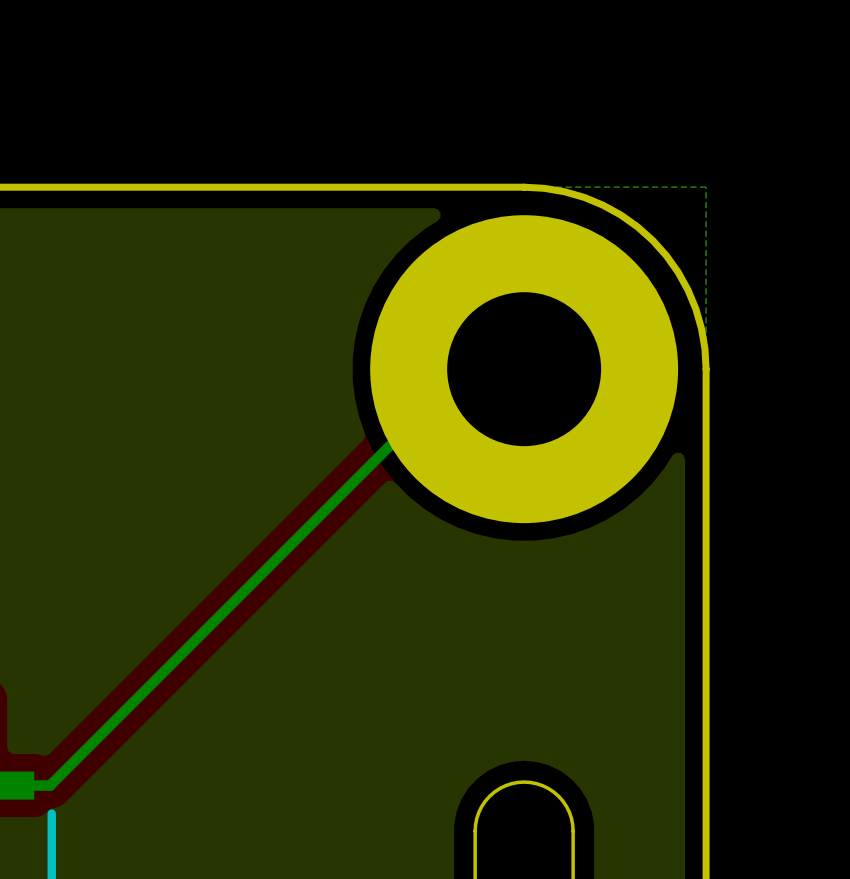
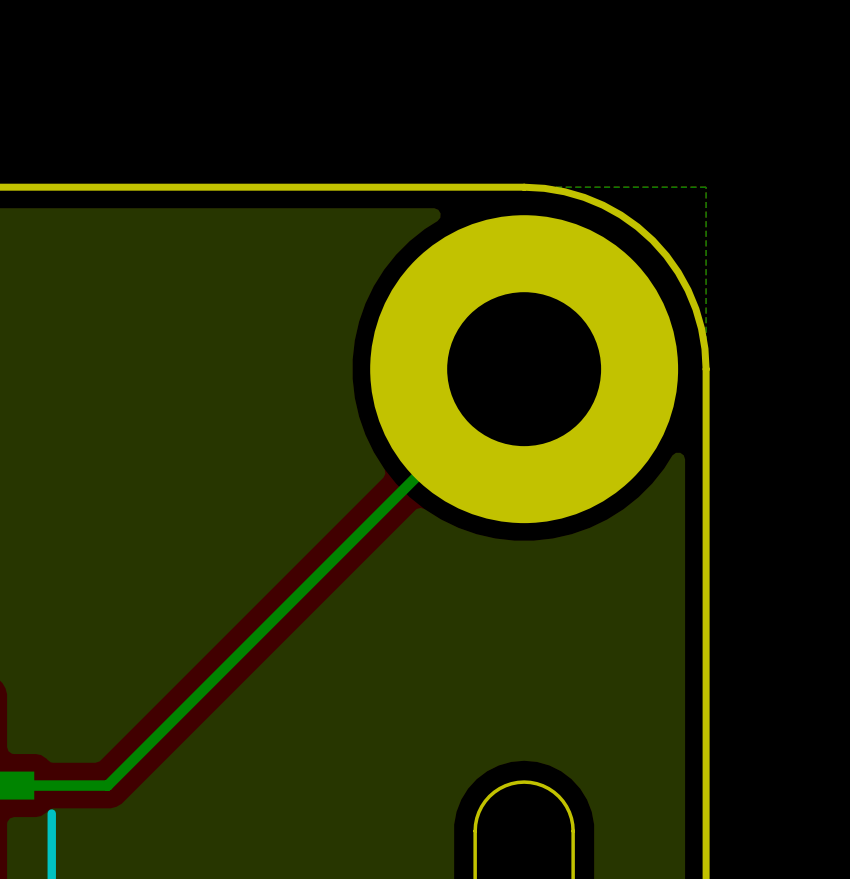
bottom track: (524, 369) (466, 369) (50, 785) -> (524, 369) (107, 785) (50, 785)

